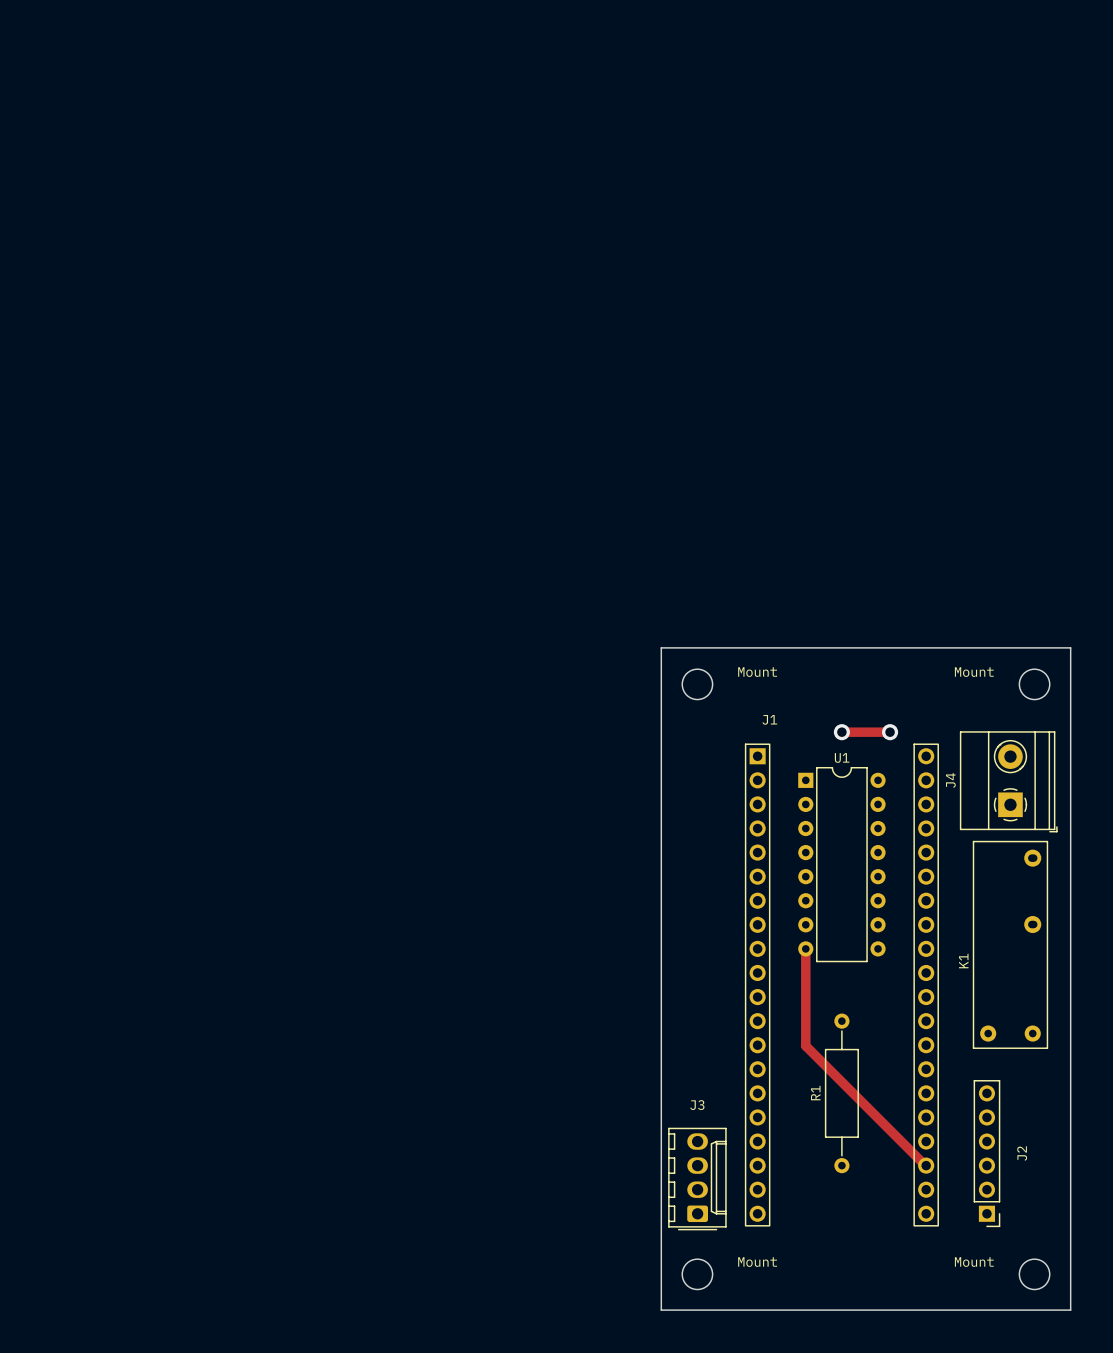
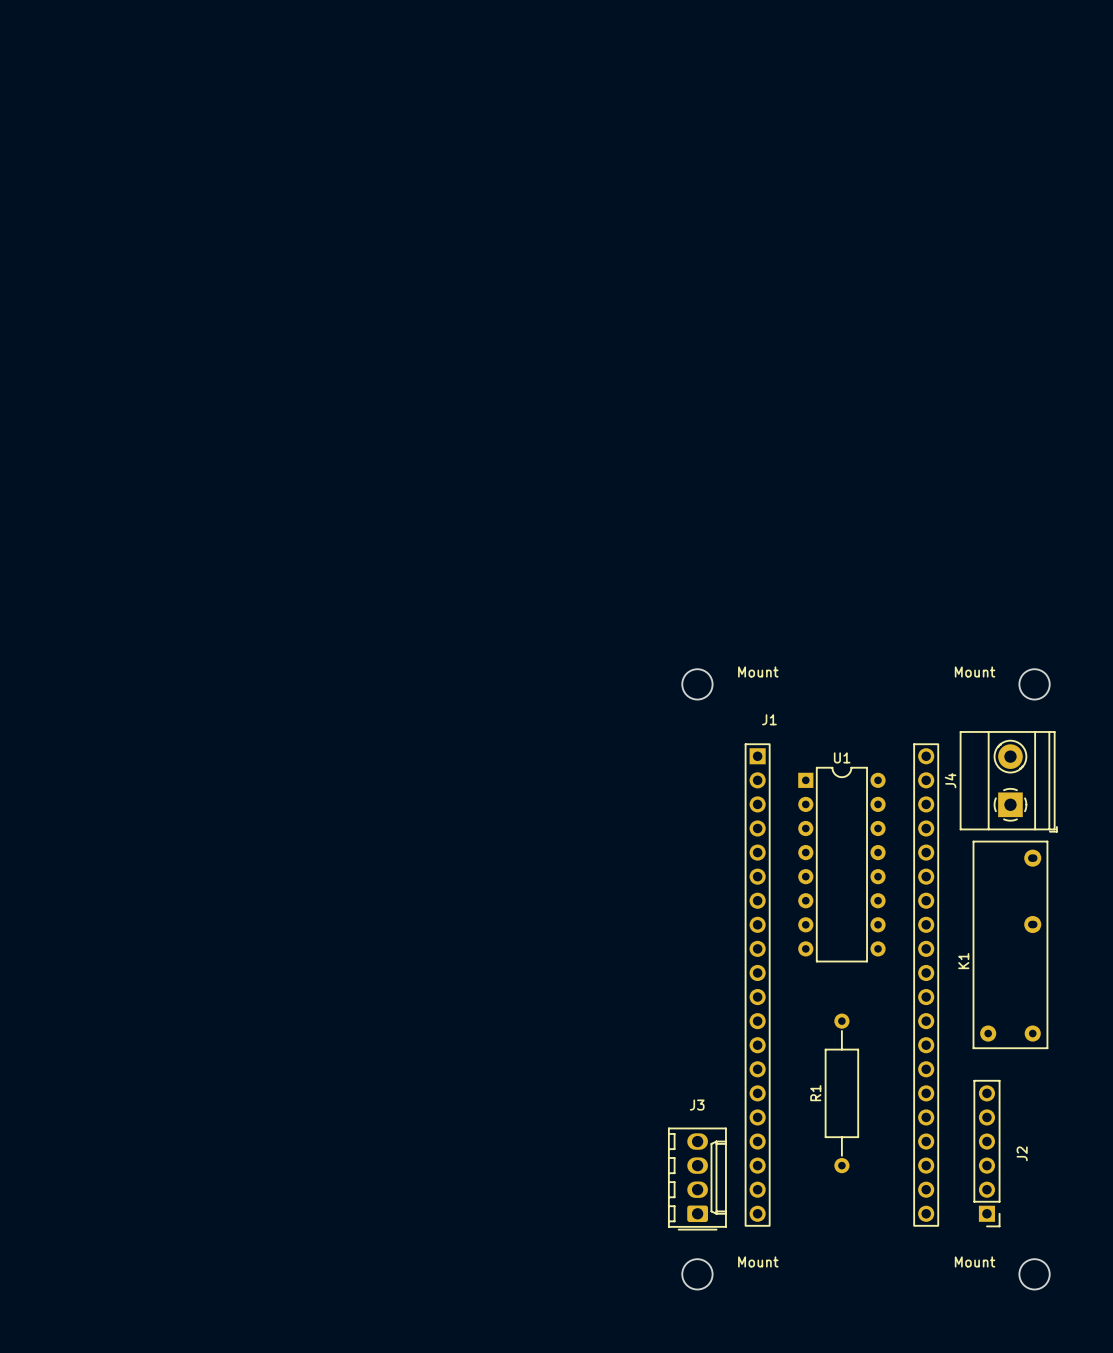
board edge: (661, 647) (1070, 647) (1070, 1310) (661, 1310) (661, 647) -> none
track: (841, 732) (890, 732) -> none
via: (841, 732) -> none
via: (890, 732) -> none
track: (805, 948) (805, 1045) (926, 1165) -> none

